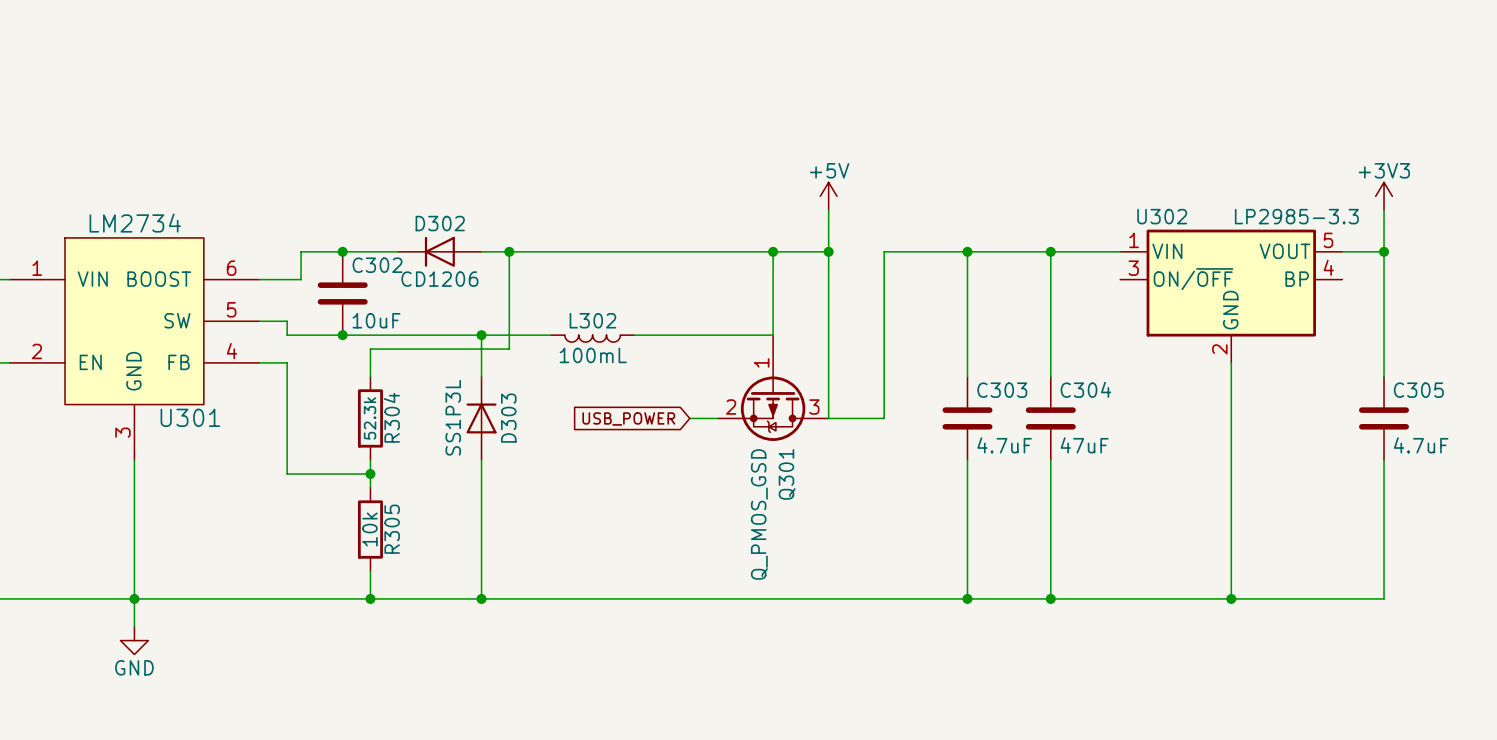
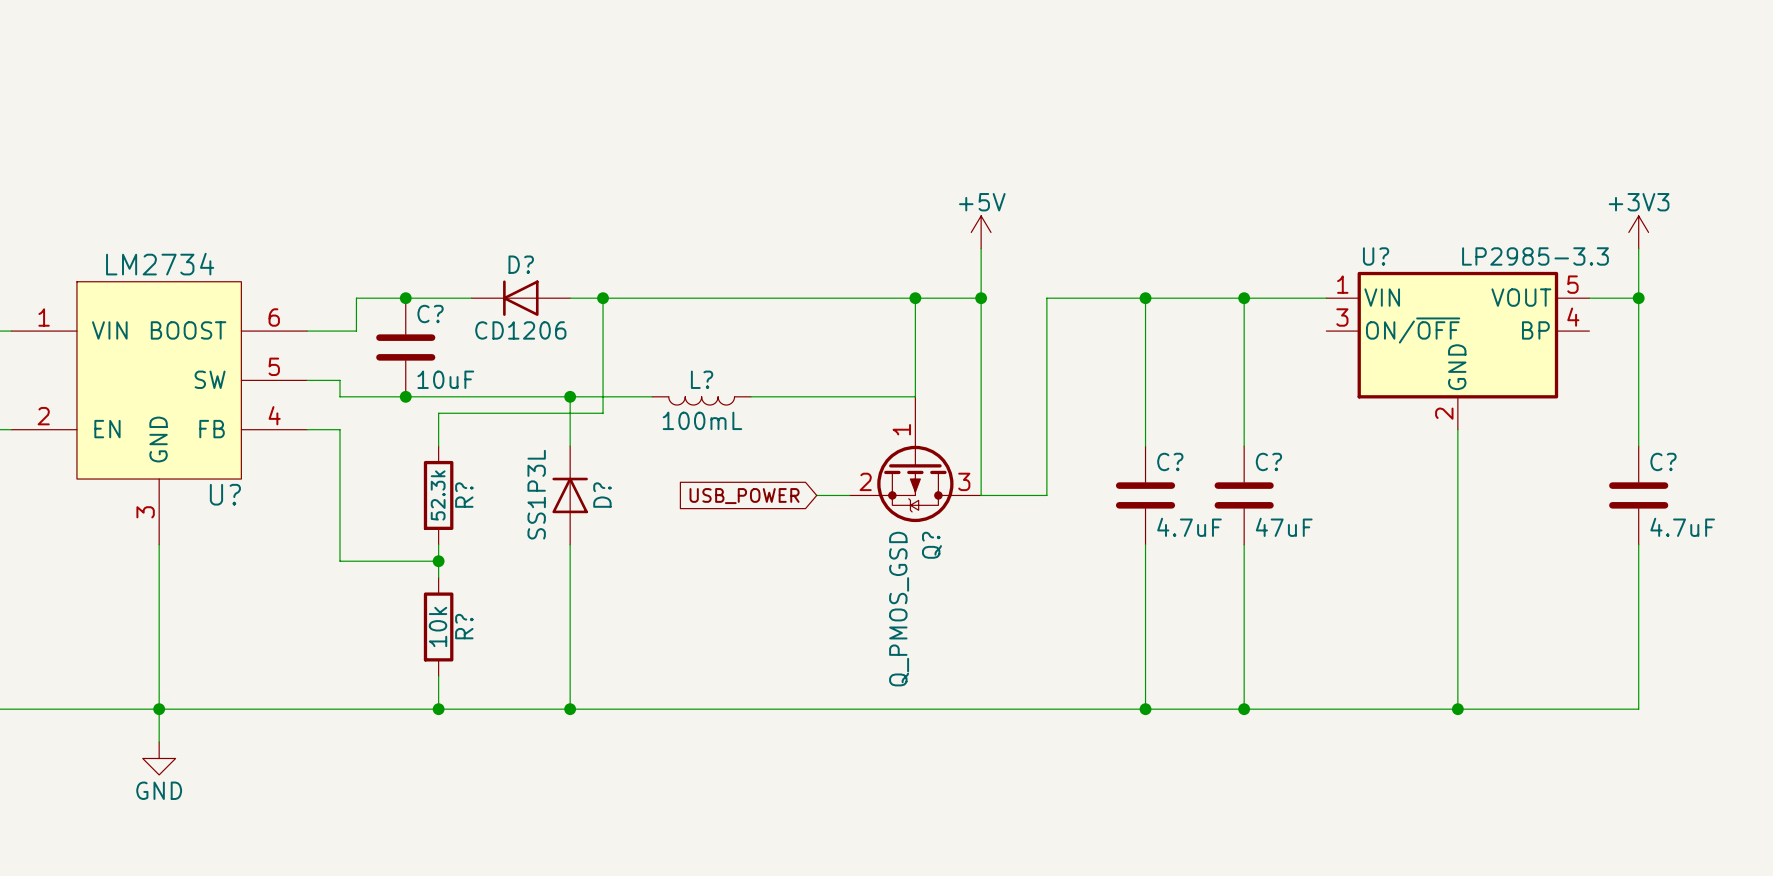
U302 name: U302 (1162, 216) -> U? (1376, 256)
D302 name: D302 (440, 223) -> D? (521, 264)
C302 name: C302 (377, 265) -> C? (430, 314)
L302 name: L302 (592, 320) -> L? (702, 379)
C304 name: C304 (1085, 389) -> C? (1268, 461)
C303 name: C303 (1002, 390) -> C? (1170, 461)
C305 name: C305 (1418, 390) -> C? (1663, 461)
U301 name: U301 (190, 417) -> U? (225, 494)
R304 name: R304 (391, 417) -> R? (464, 495)
D303 name: D303 (508, 418) -> D? (602, 495)
Q301 name: Q301 (787, 474) -> Q? (931, 545)
R305 name: R305 (392, 529) -> R? (464, 626)

